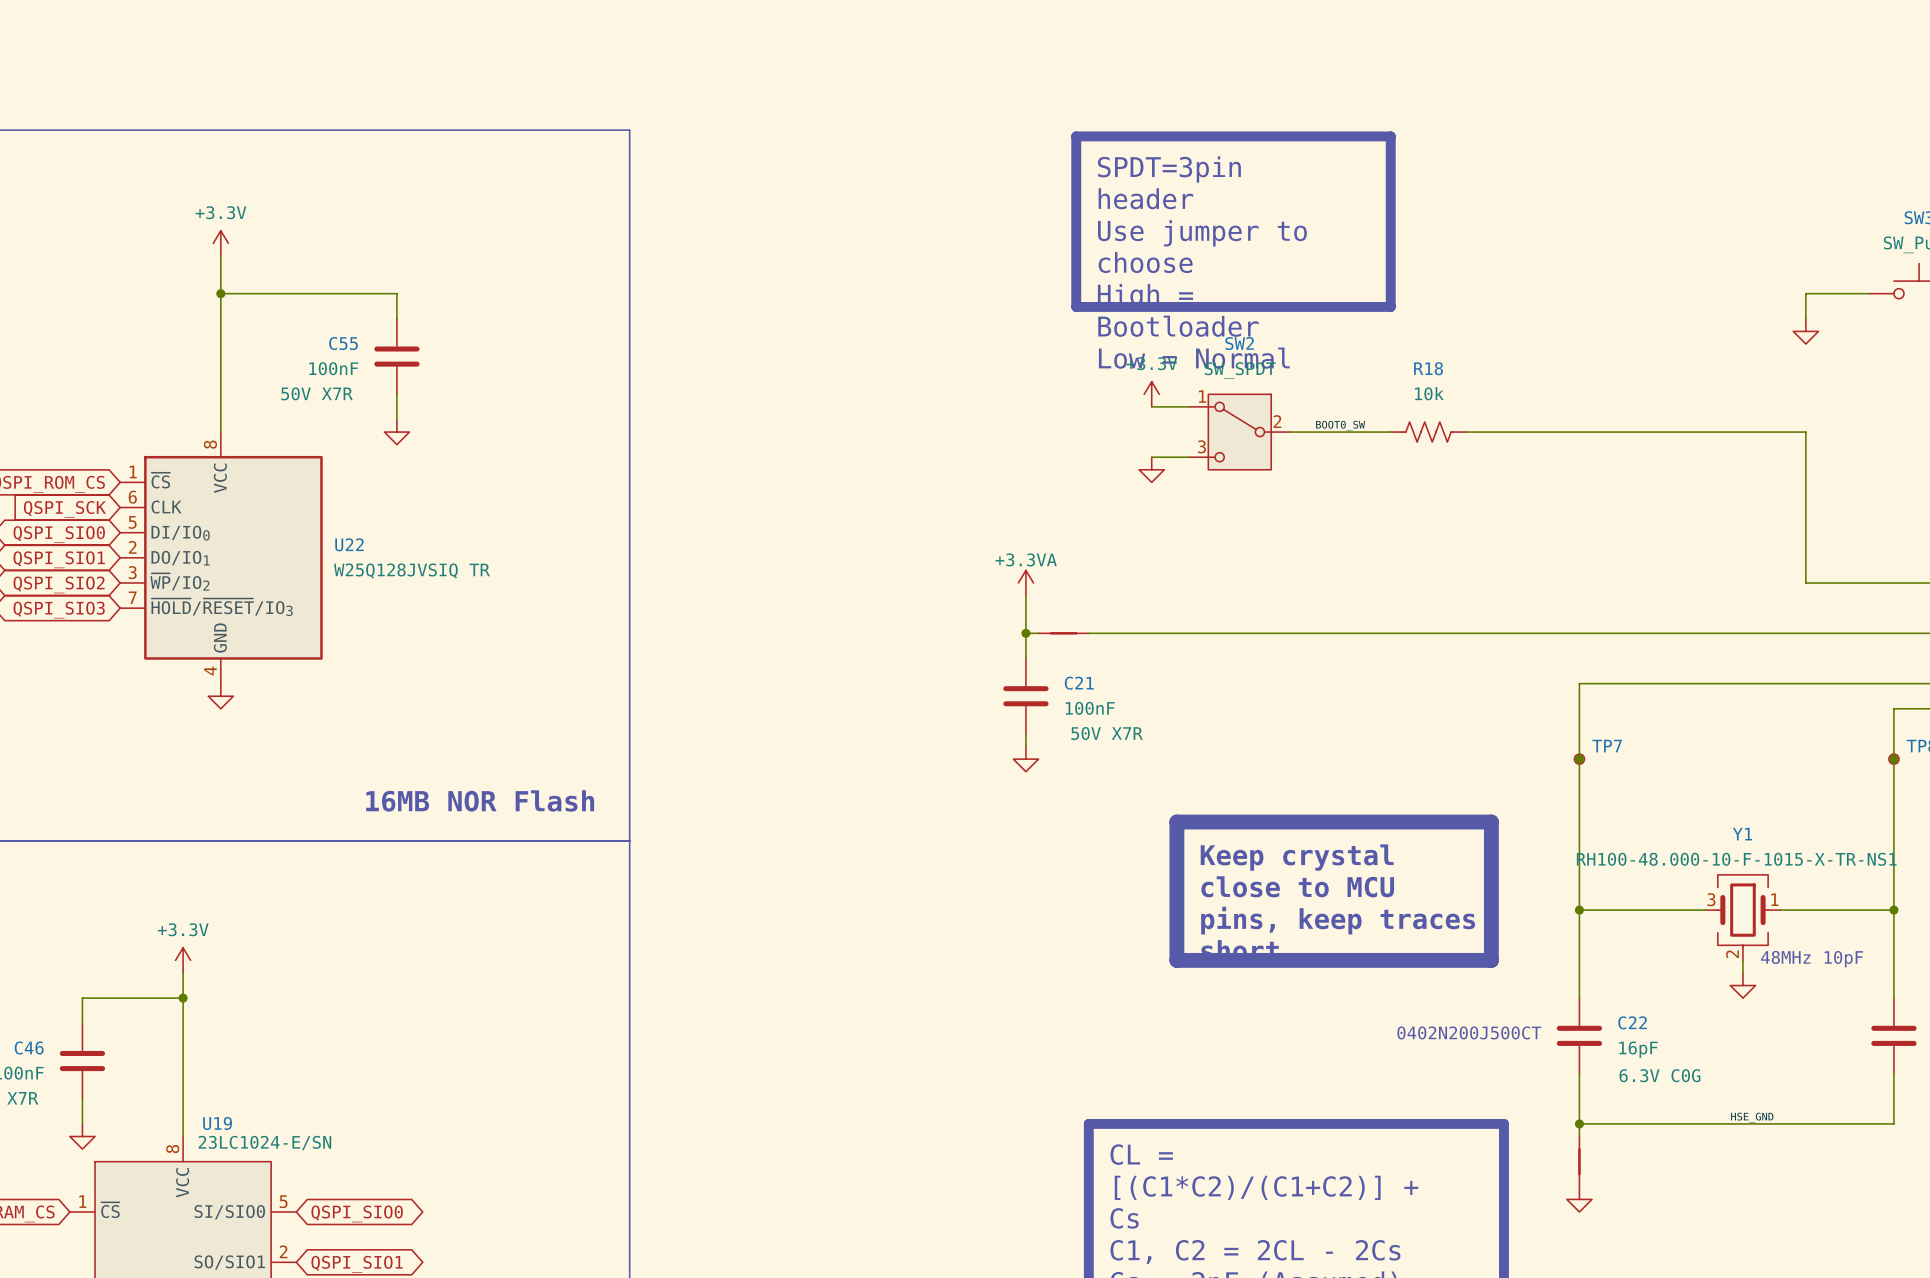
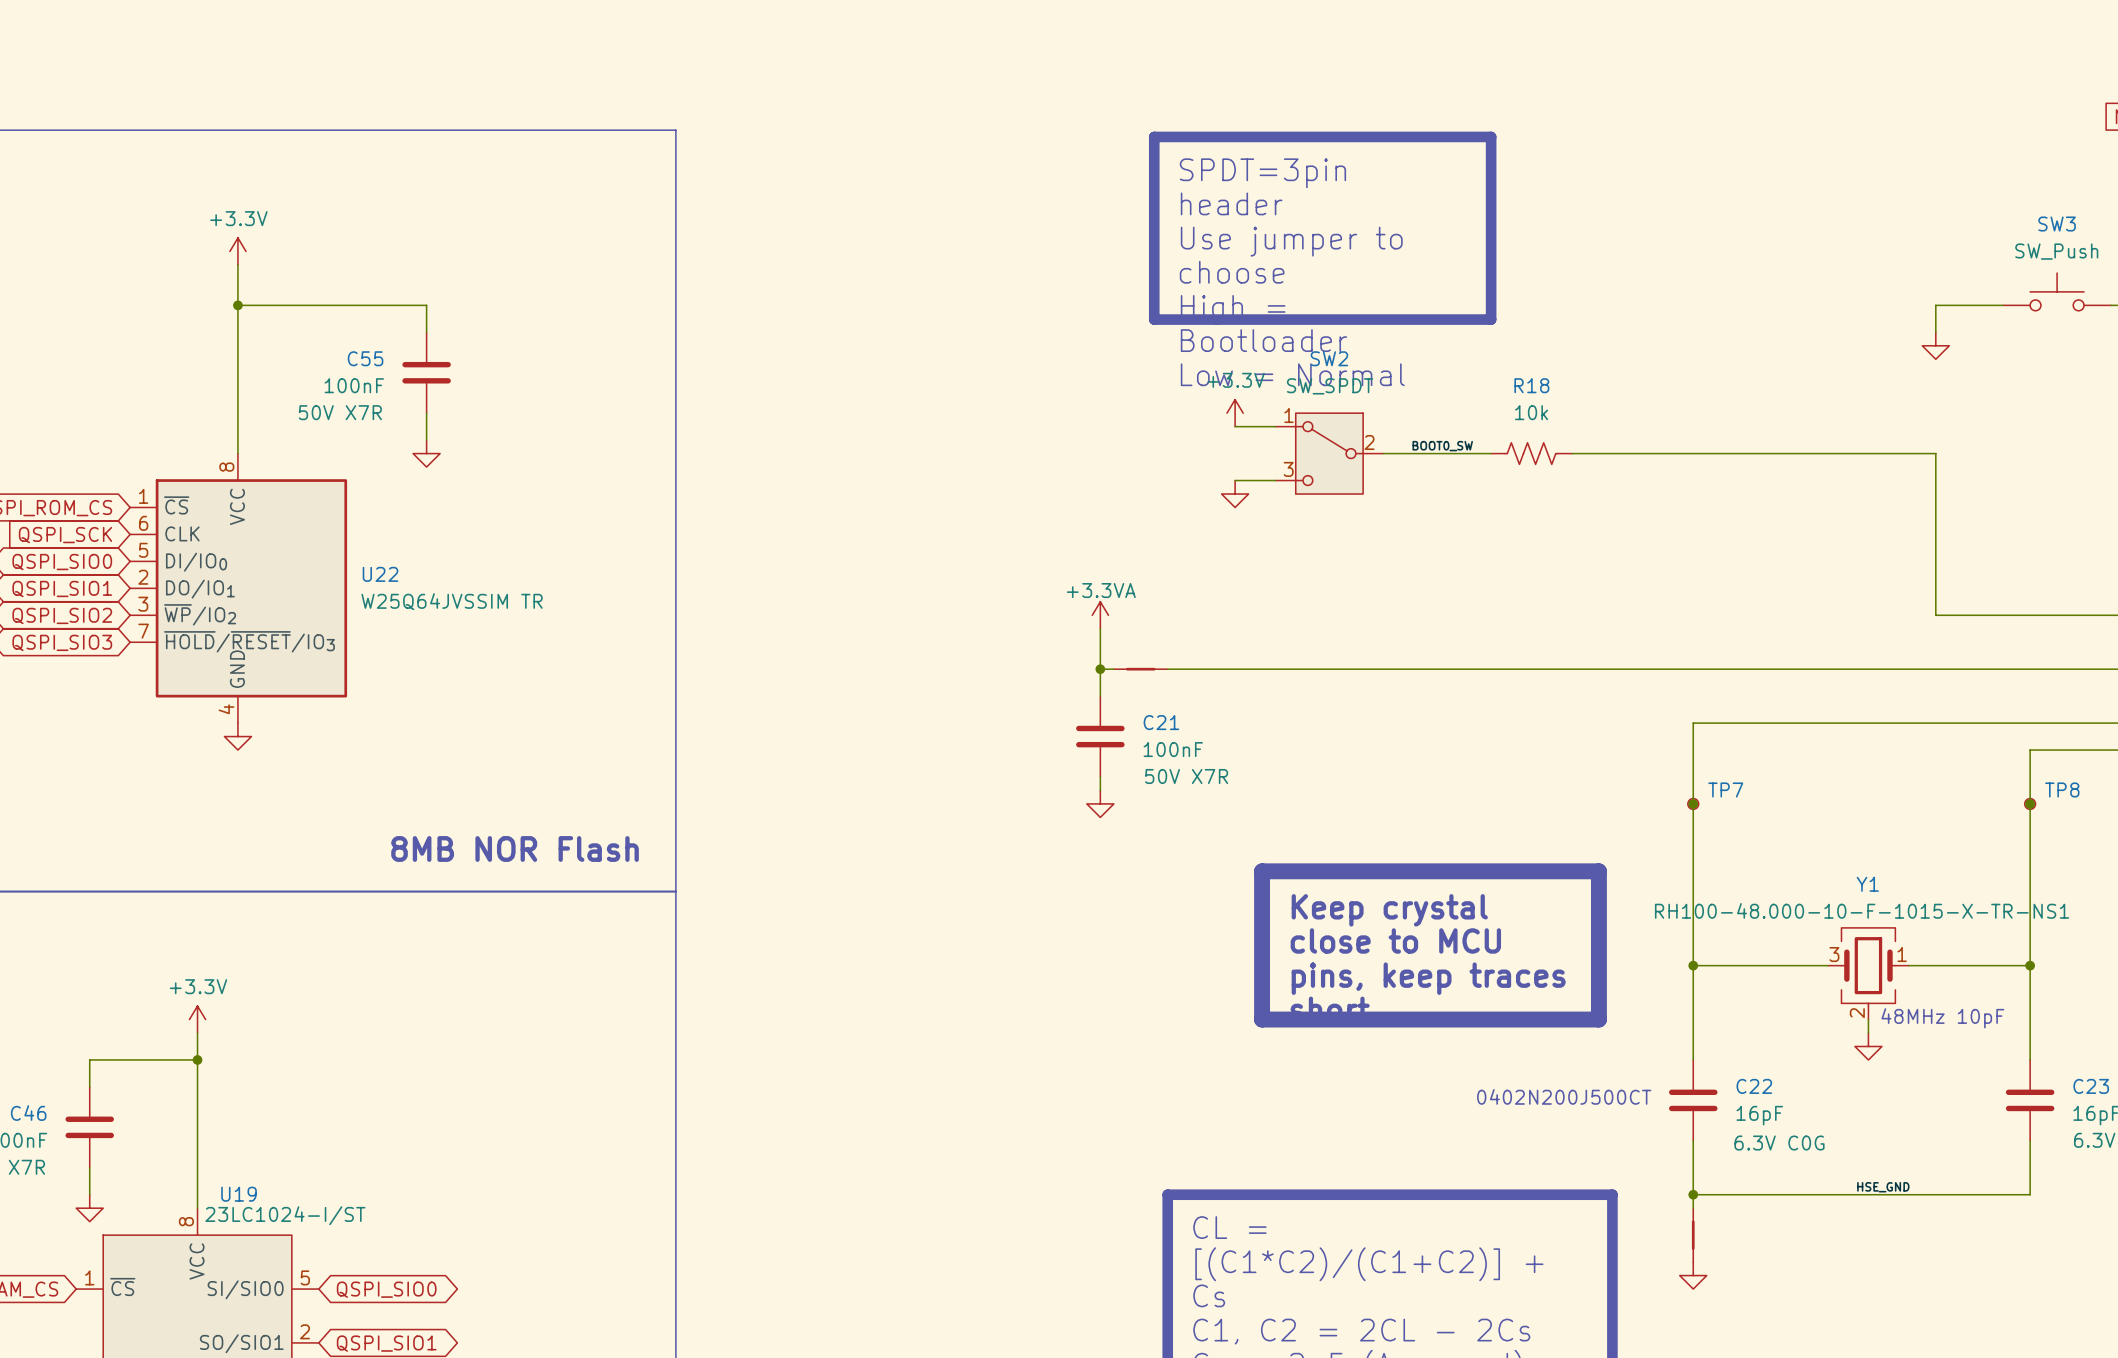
U22 value: W25Q128JVSIQ TR (411, 570) -> W25Q64JVSSIM TR (452, 601)
text: 16MB NOR Flash (480, 800) -> 8MB NOR Flash (515, 848)
U19 value: 23LC1024-E/SN (264, 1143) -> 23LC1024-I/ST (285, 1215)

